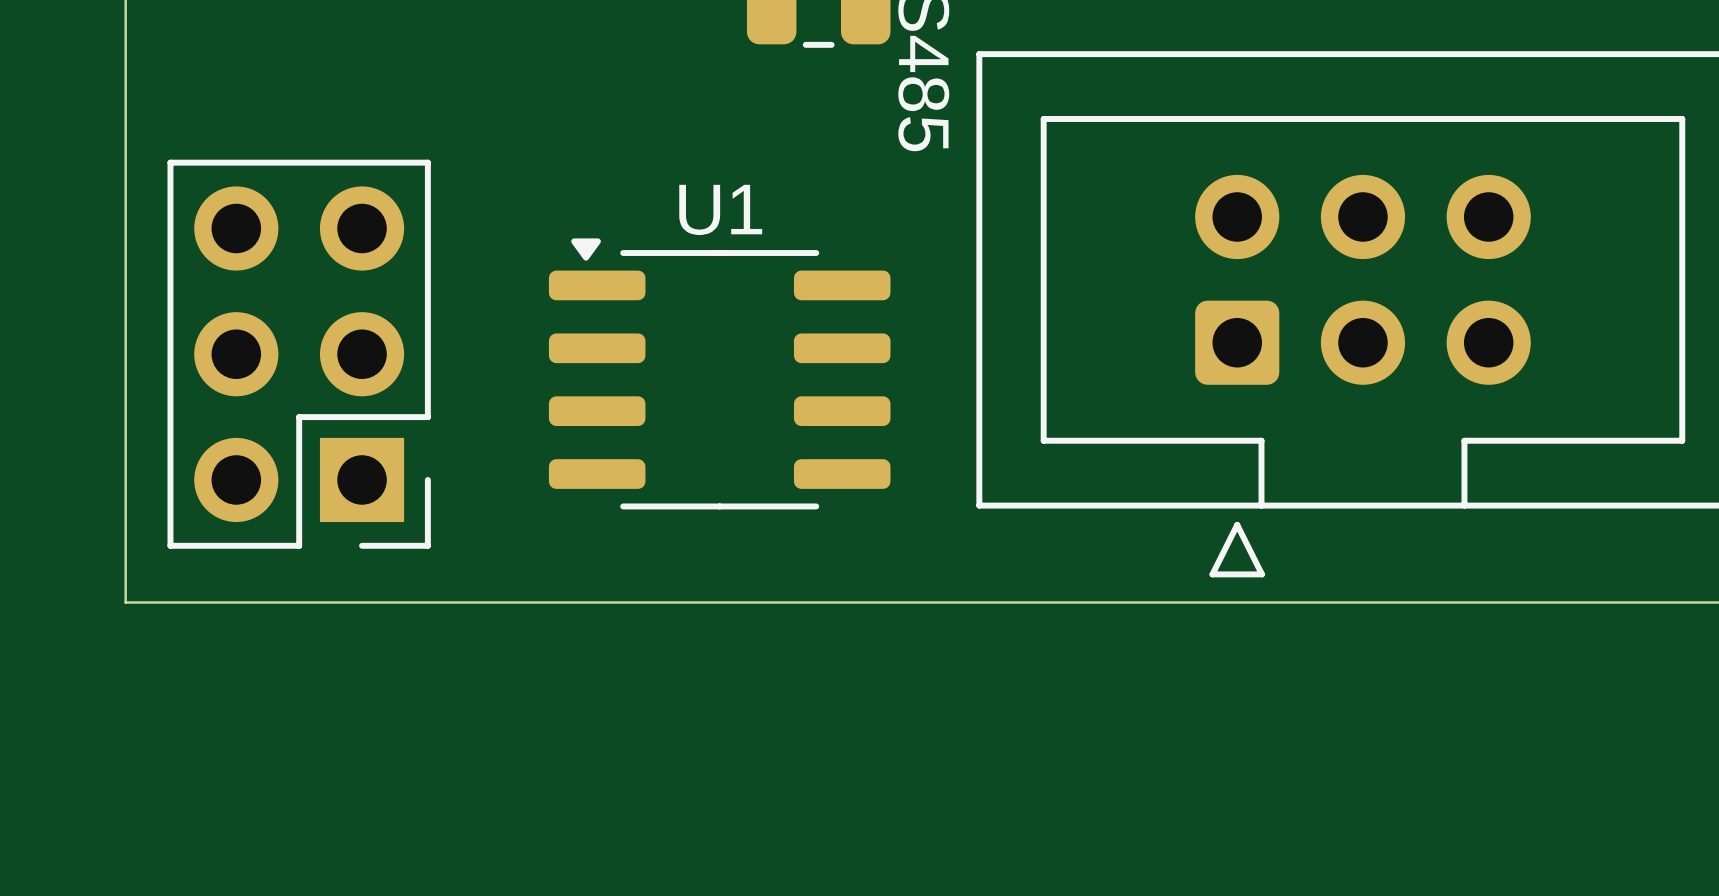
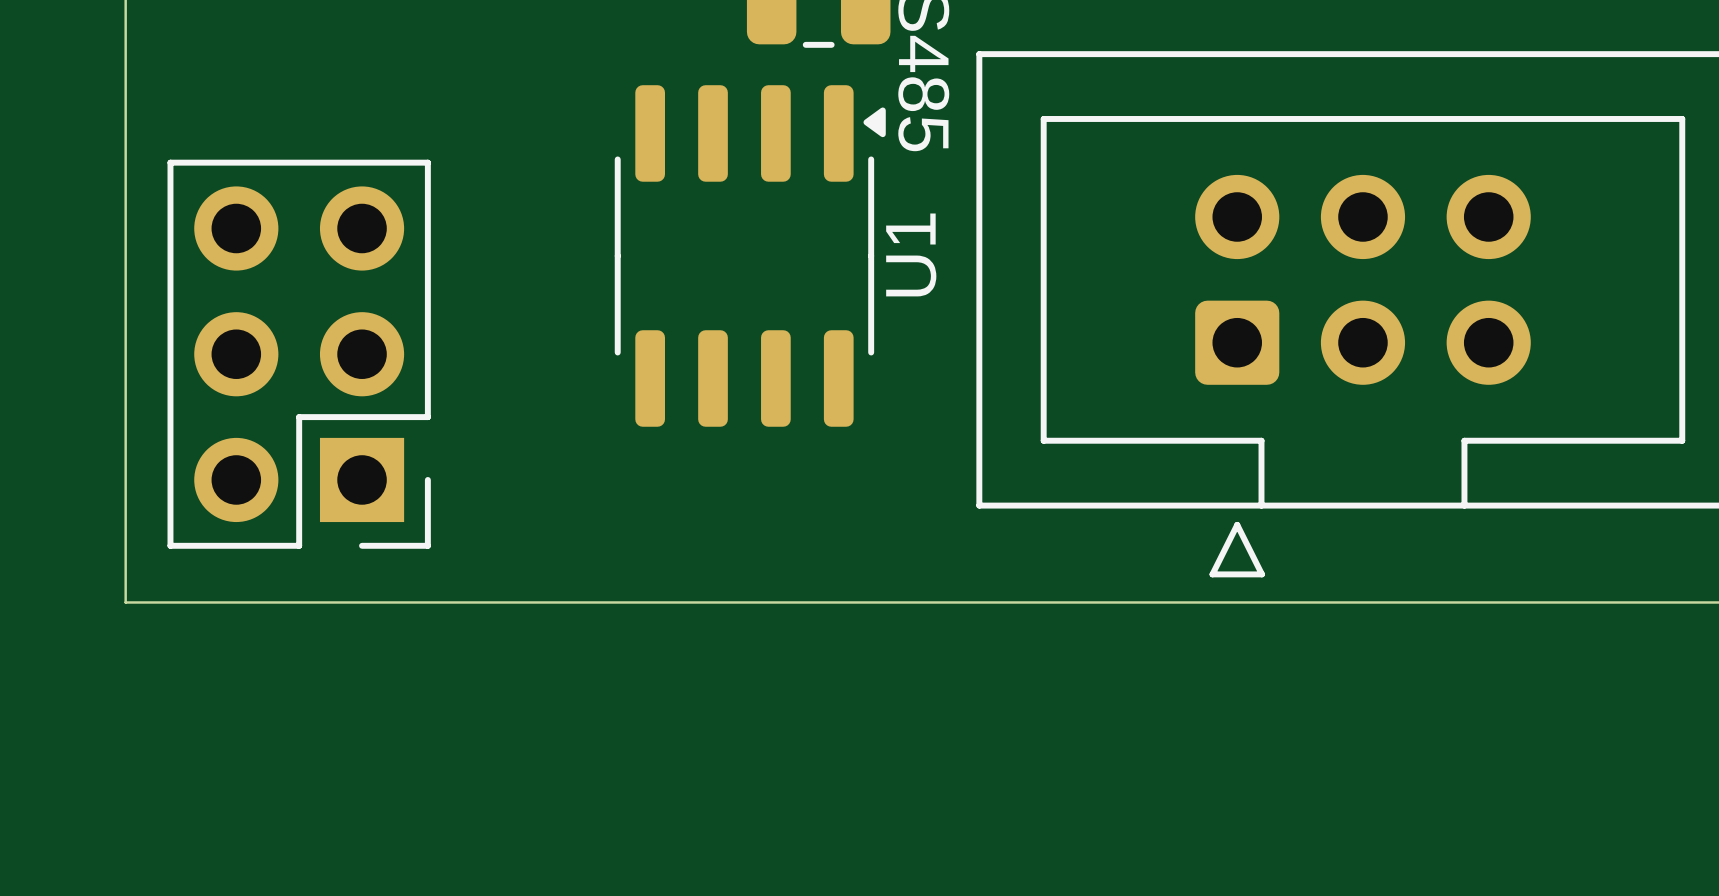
U1 rotation: 0° (719, 373) -> 90° clockwise (750, 255)

